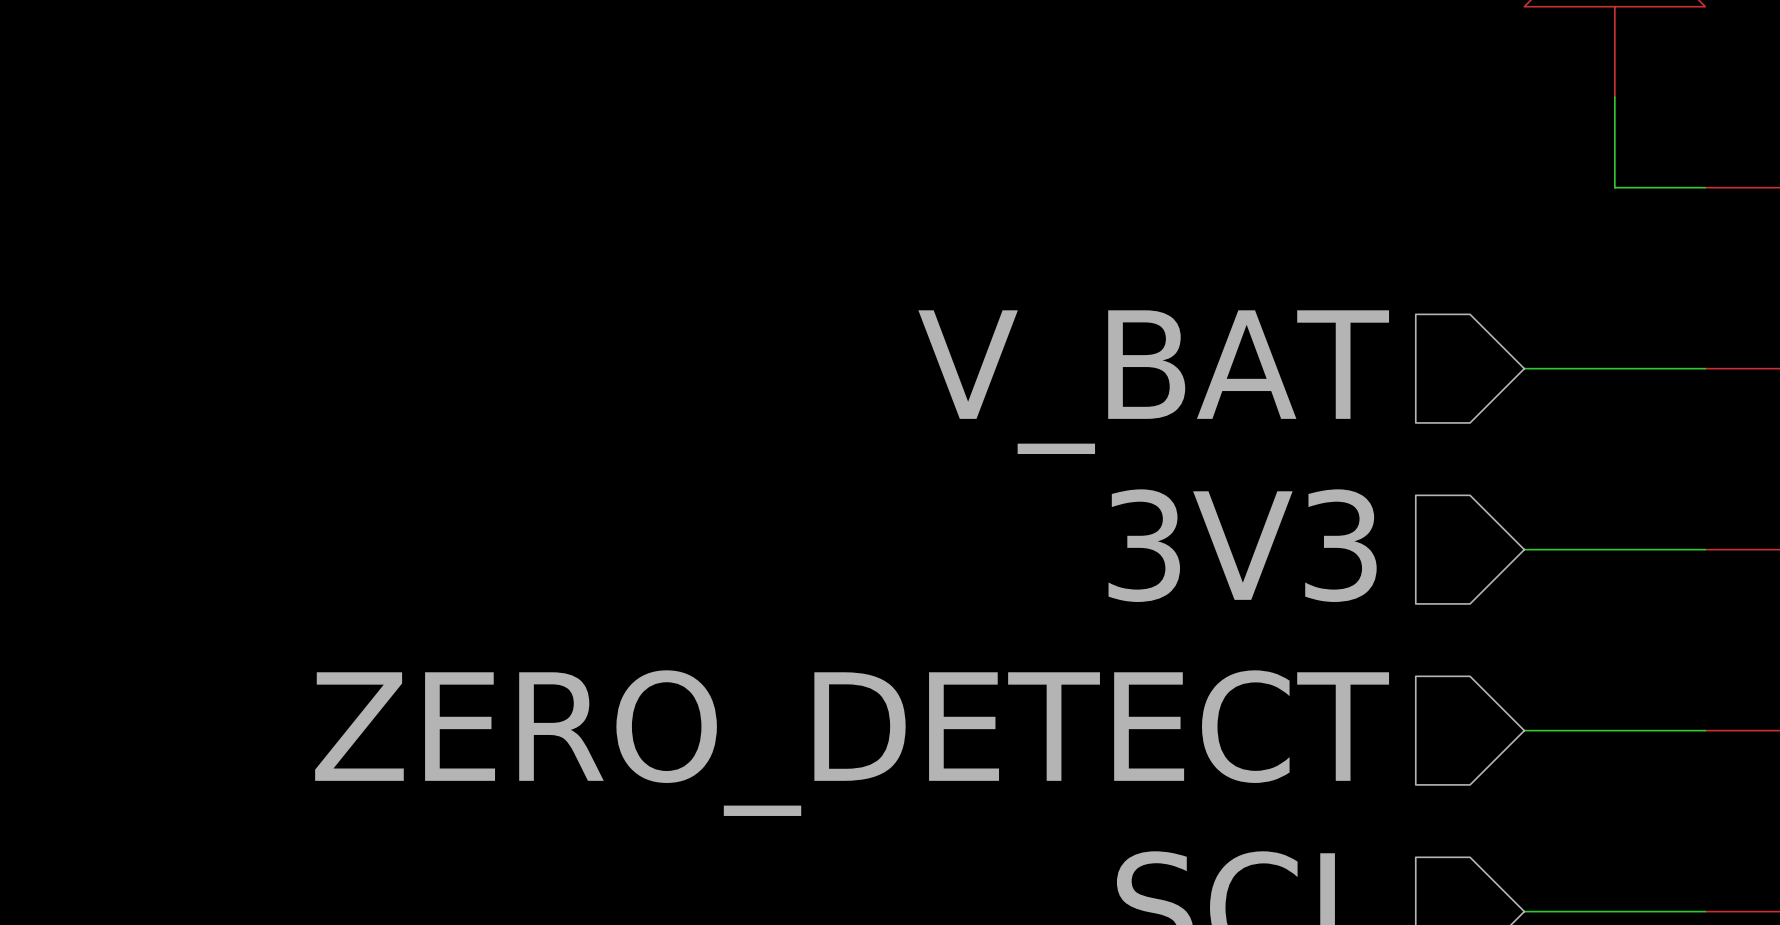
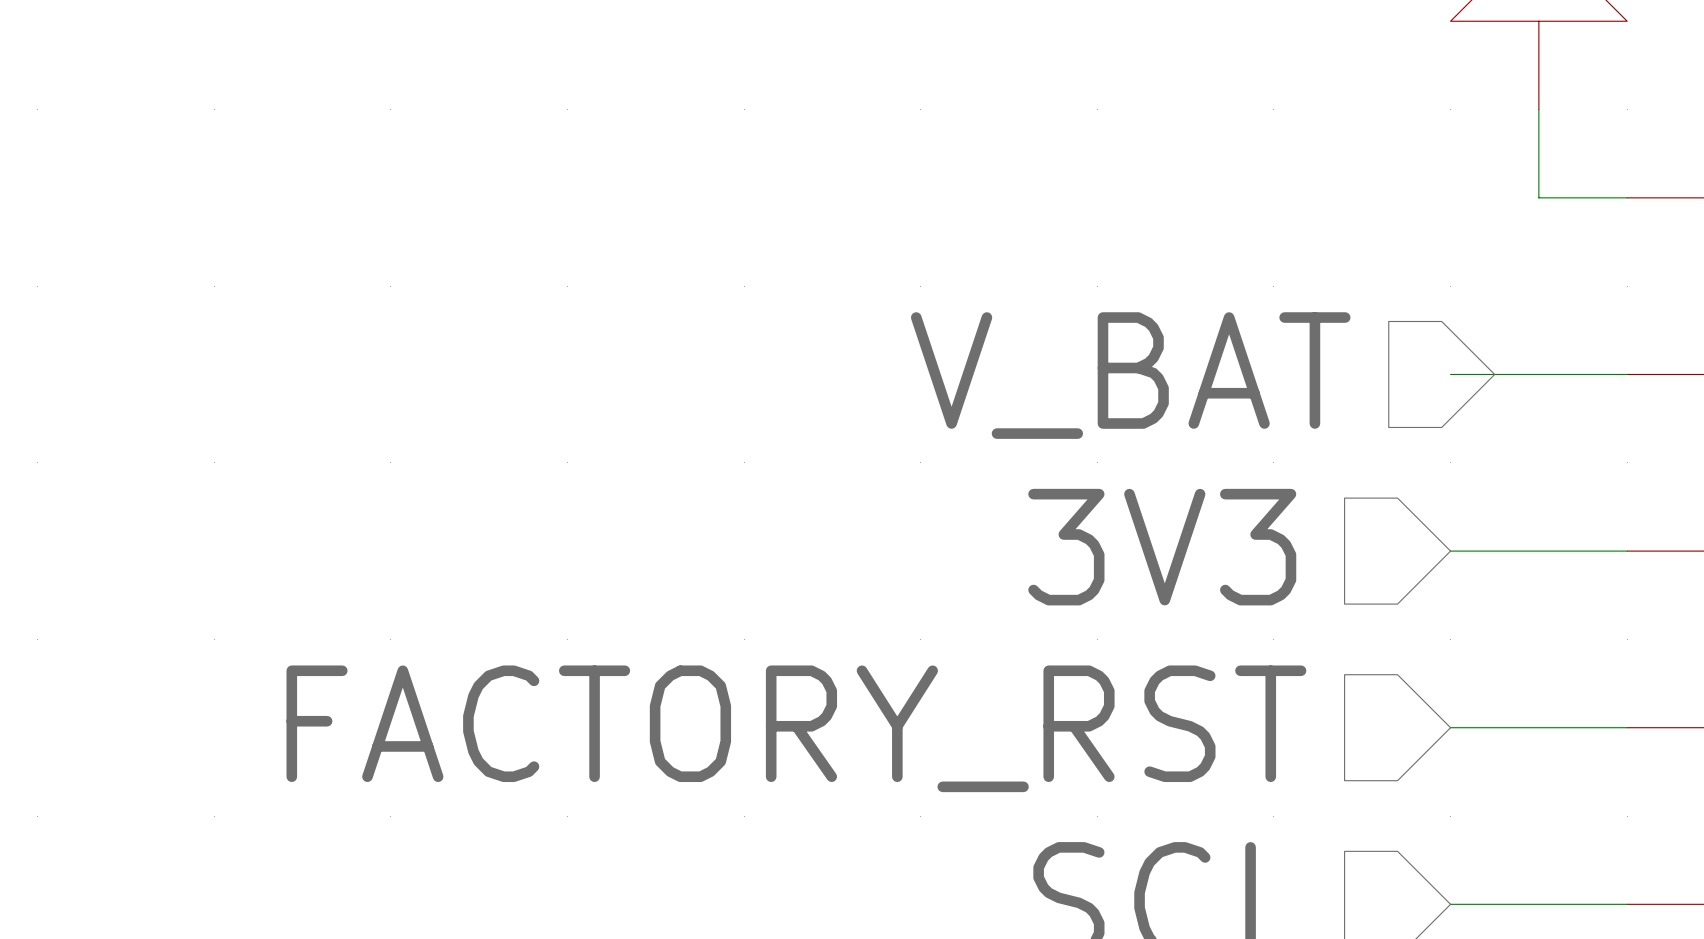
hierarchical label position: V_BAT (1153, 382) -> V_BAT (1130, 375)
hierarchical label: ZERO_DETECT (852, 743) -> FACTORY_RST (796, 728)

